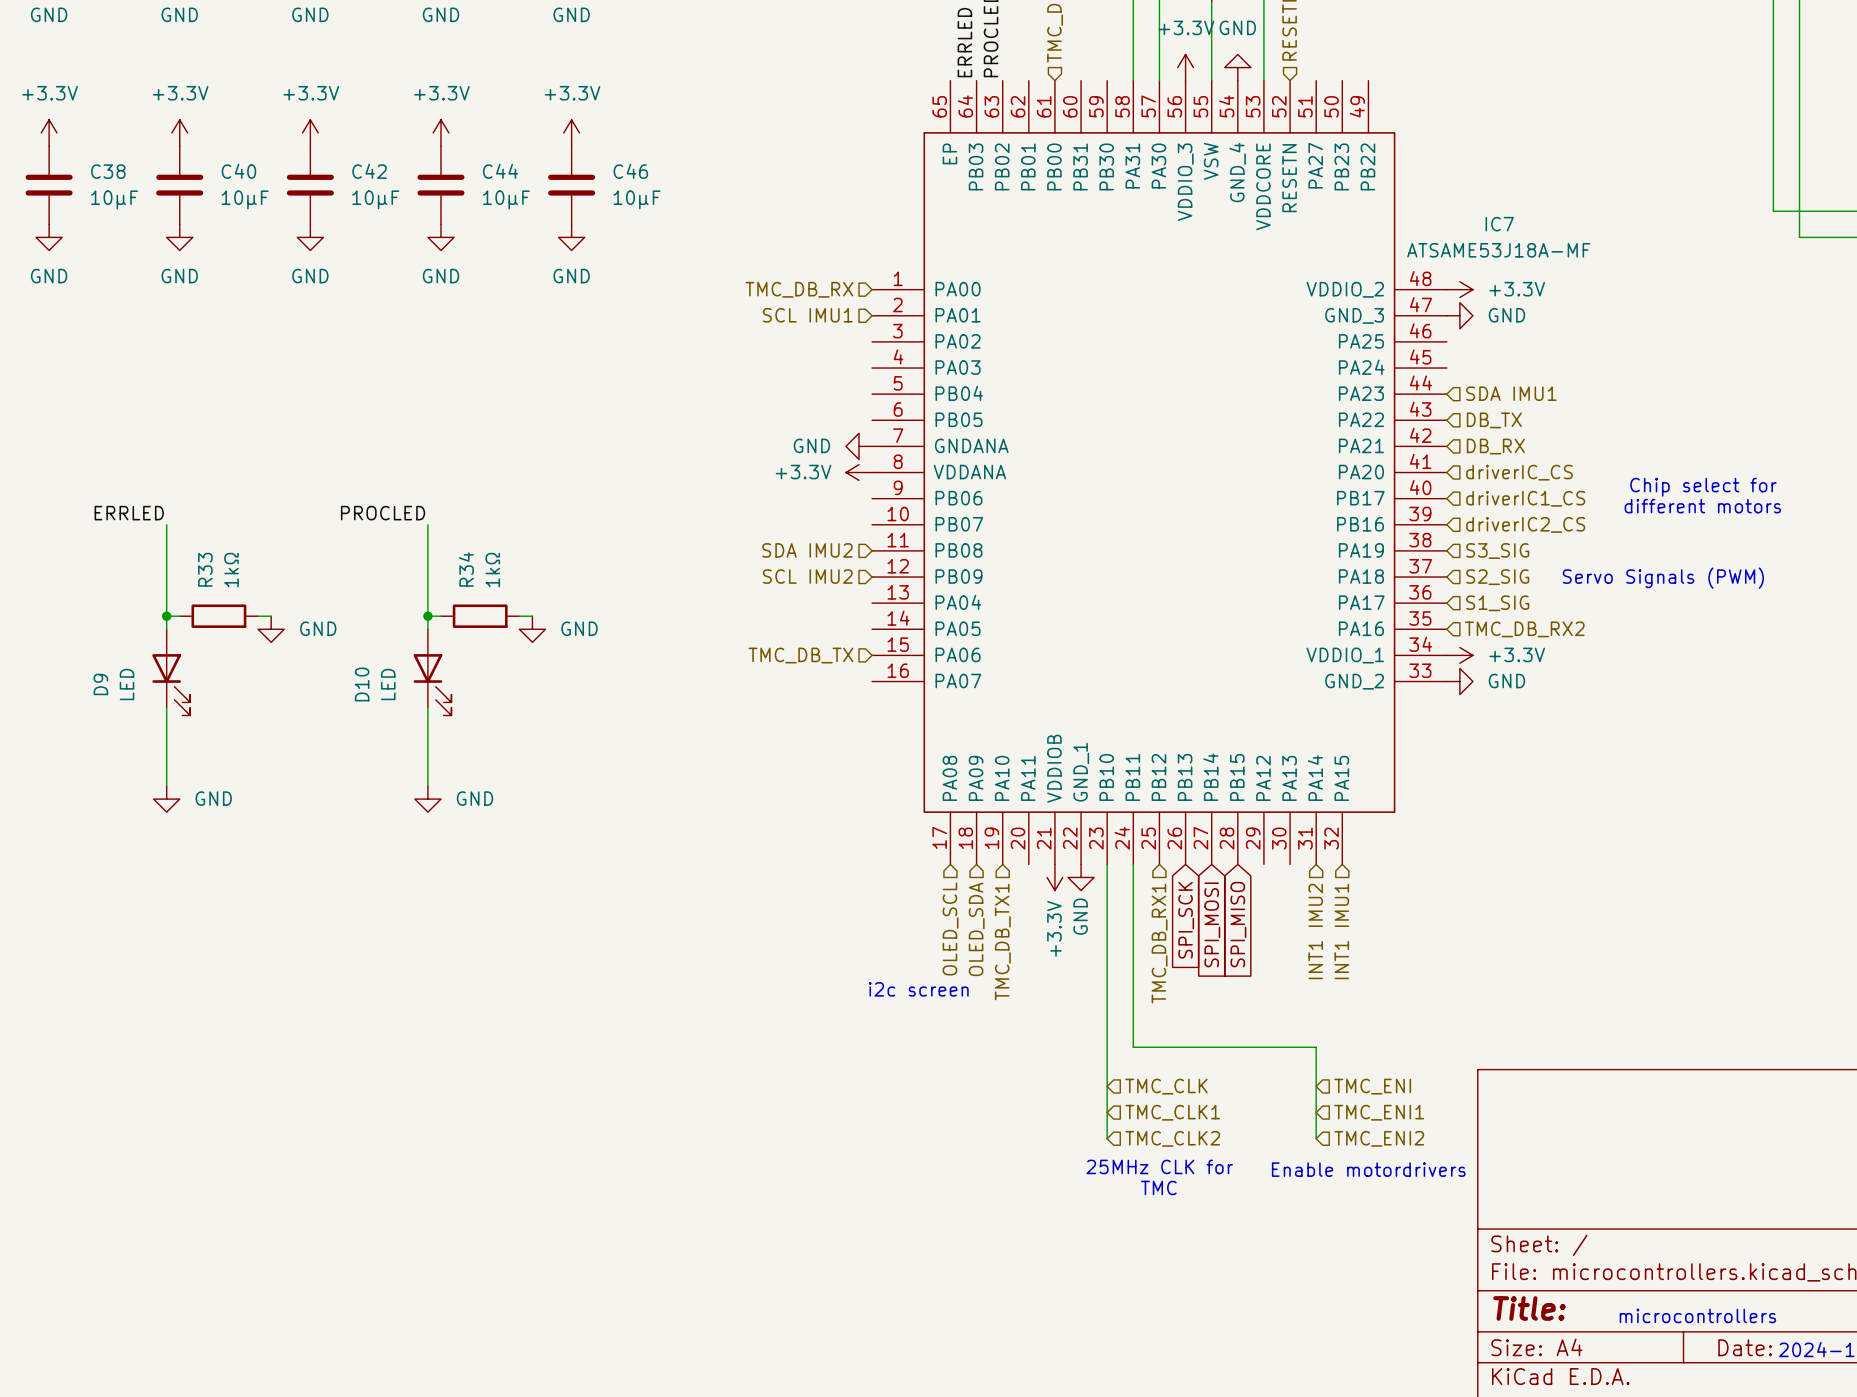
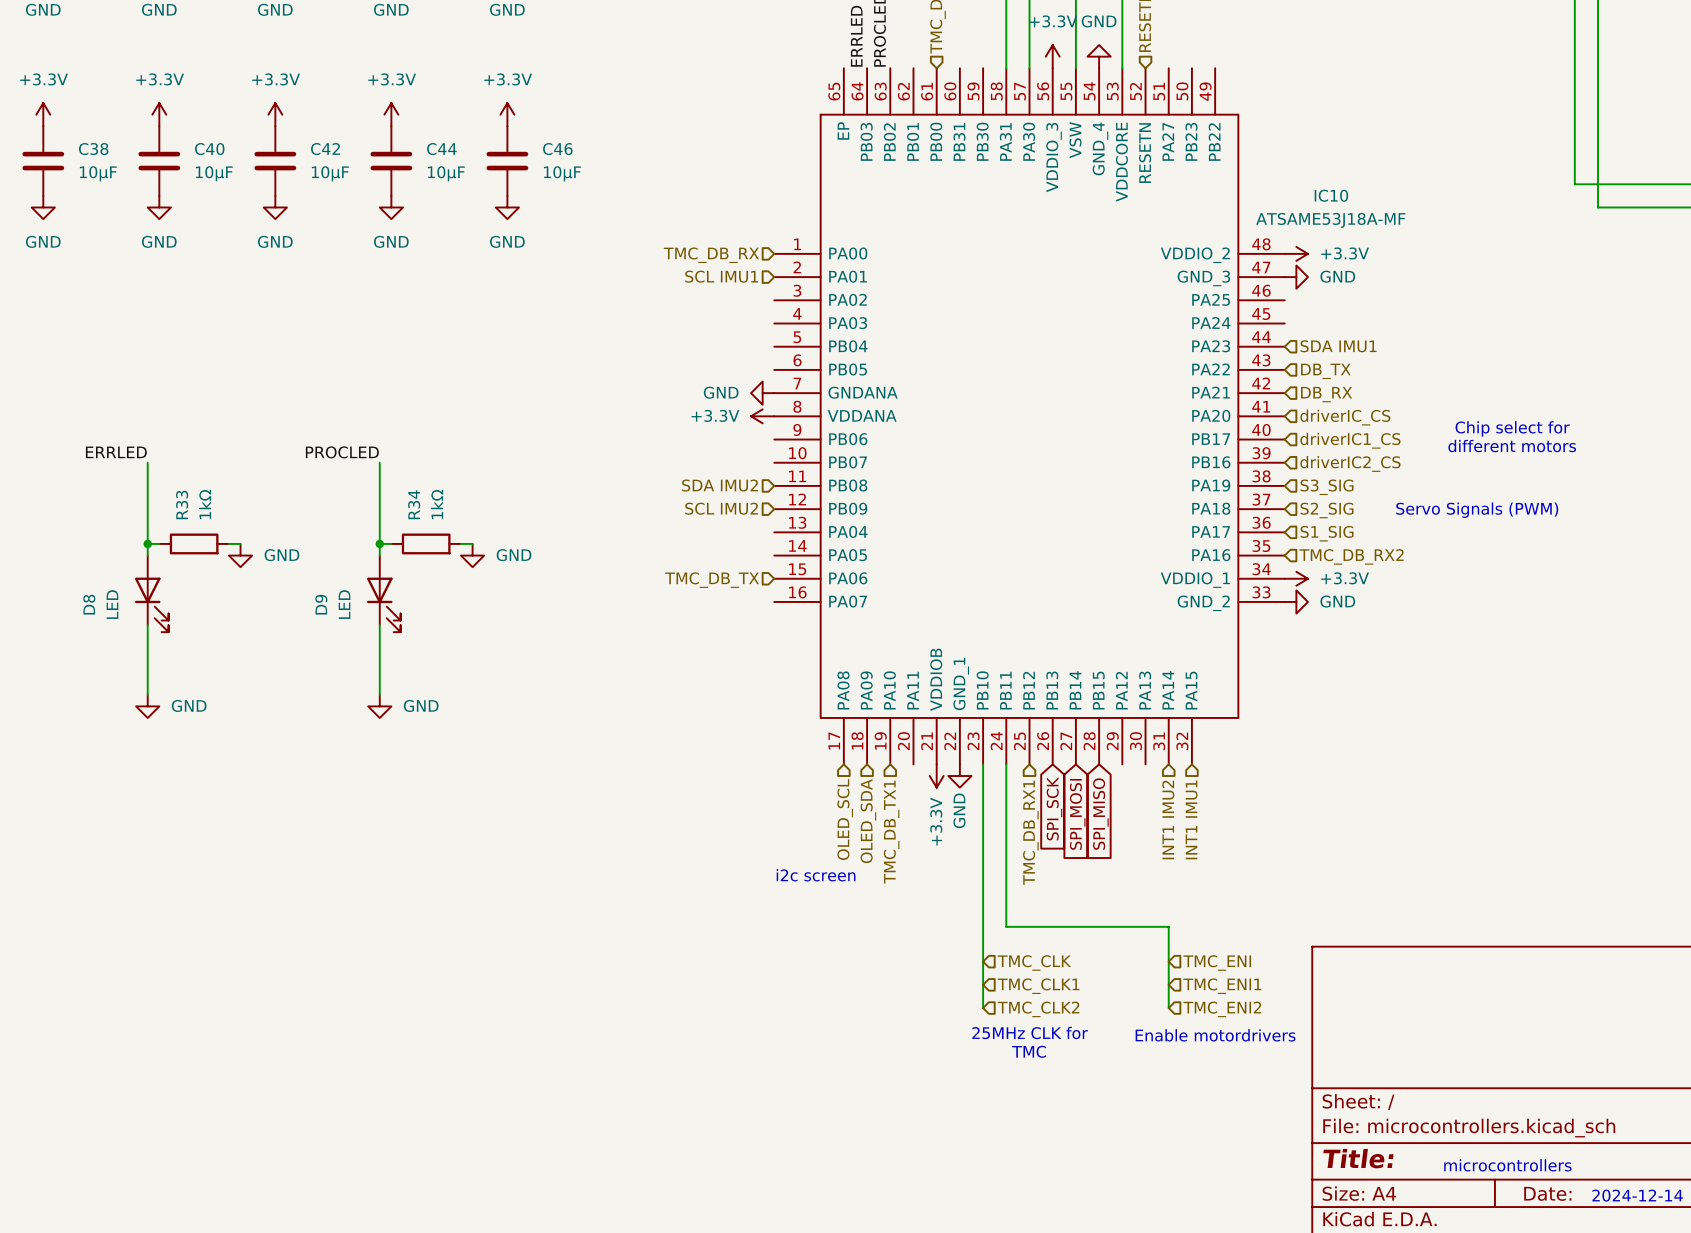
IC7 name: IC7 (1499, 224) -> IC10 (1331, 195)
D9 name: D9 (100, 684) -> D8 (89, 604)
D10 name: D10 (362, 684) -> D9 (321, 604)

